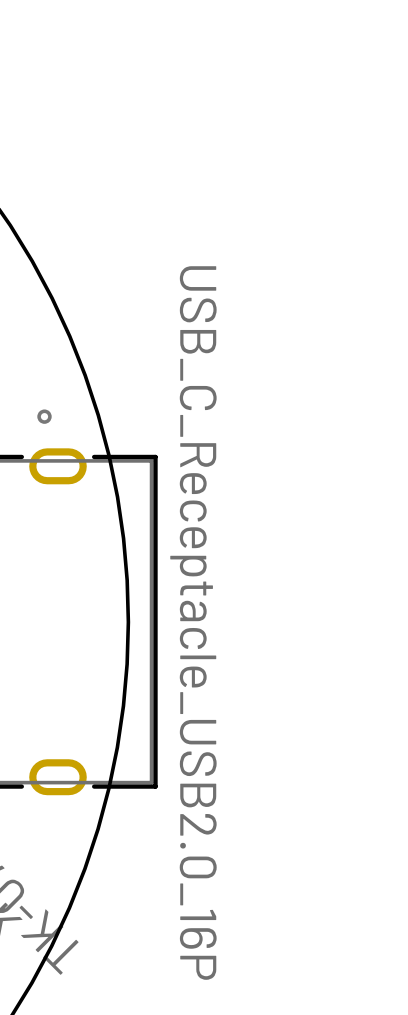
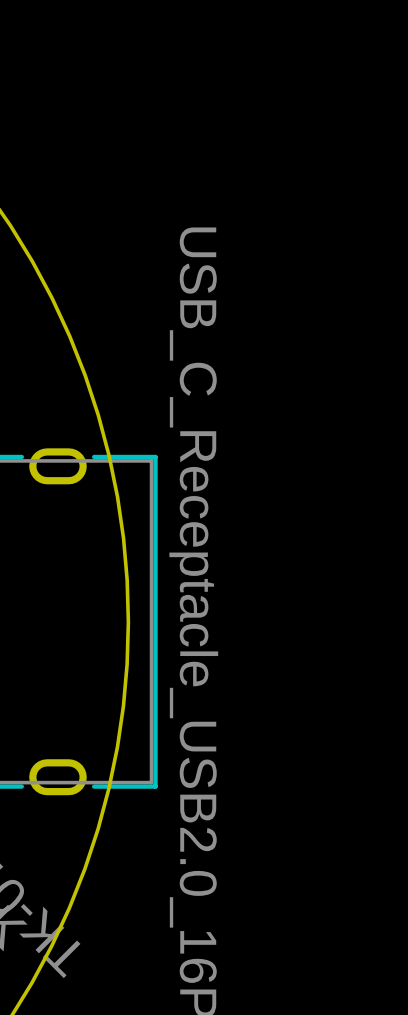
via: (44, 416) -> none

